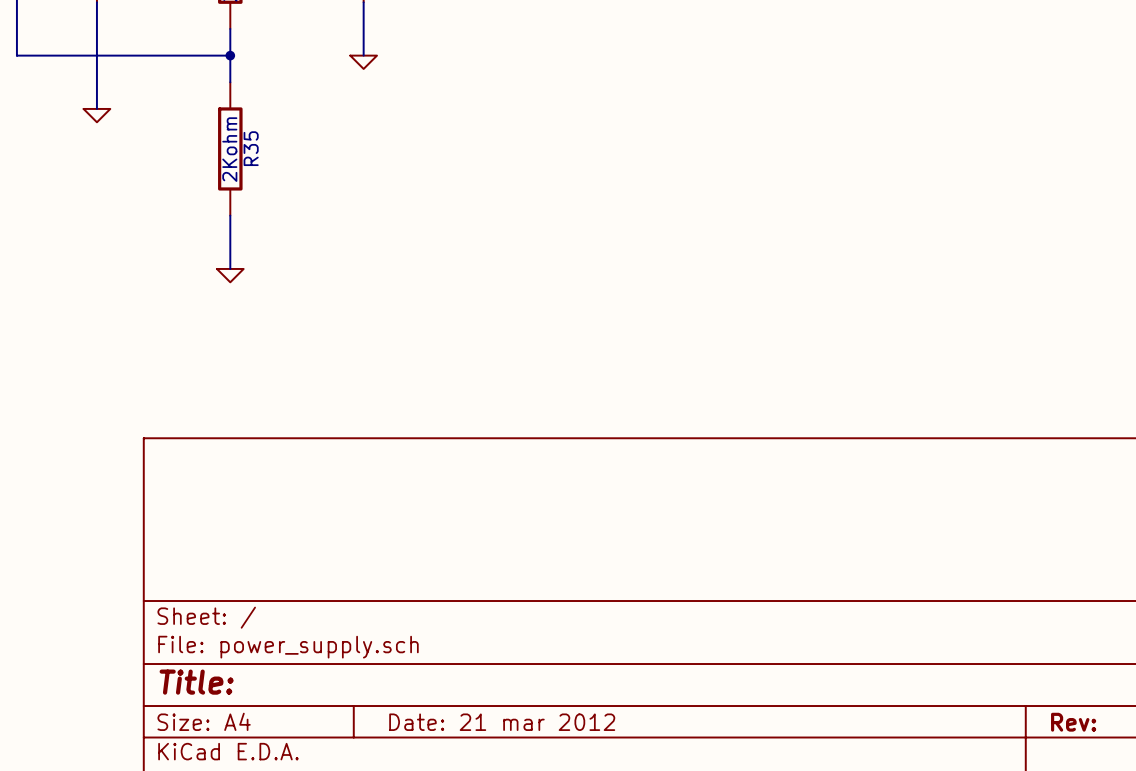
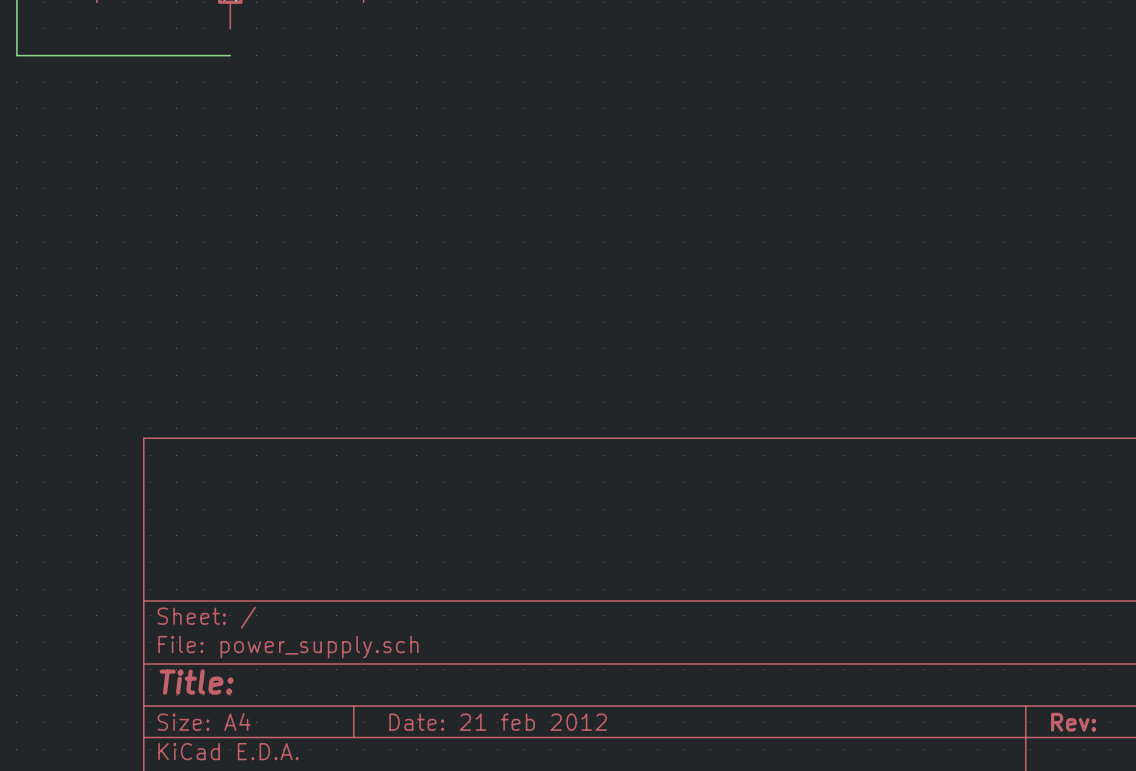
wire: (96, 2) (96, 108) -> none
wire: (363, 2) (363, 55) -> none
wire: (230, 28) (230, 82) -> none
junction: (230, 55) -> none
power symbol: (363, 62) -> none
power symbol: (96, 115) -> none
R35: 2Kohm (230, 148) -> none
wire: (230, 215) (230, 268) -> none
power symbol: (230, 275) -> none
title block: Date: 21 mar 2012 (502, 722) -> Date: 21 feb 2012 (498, 722)

